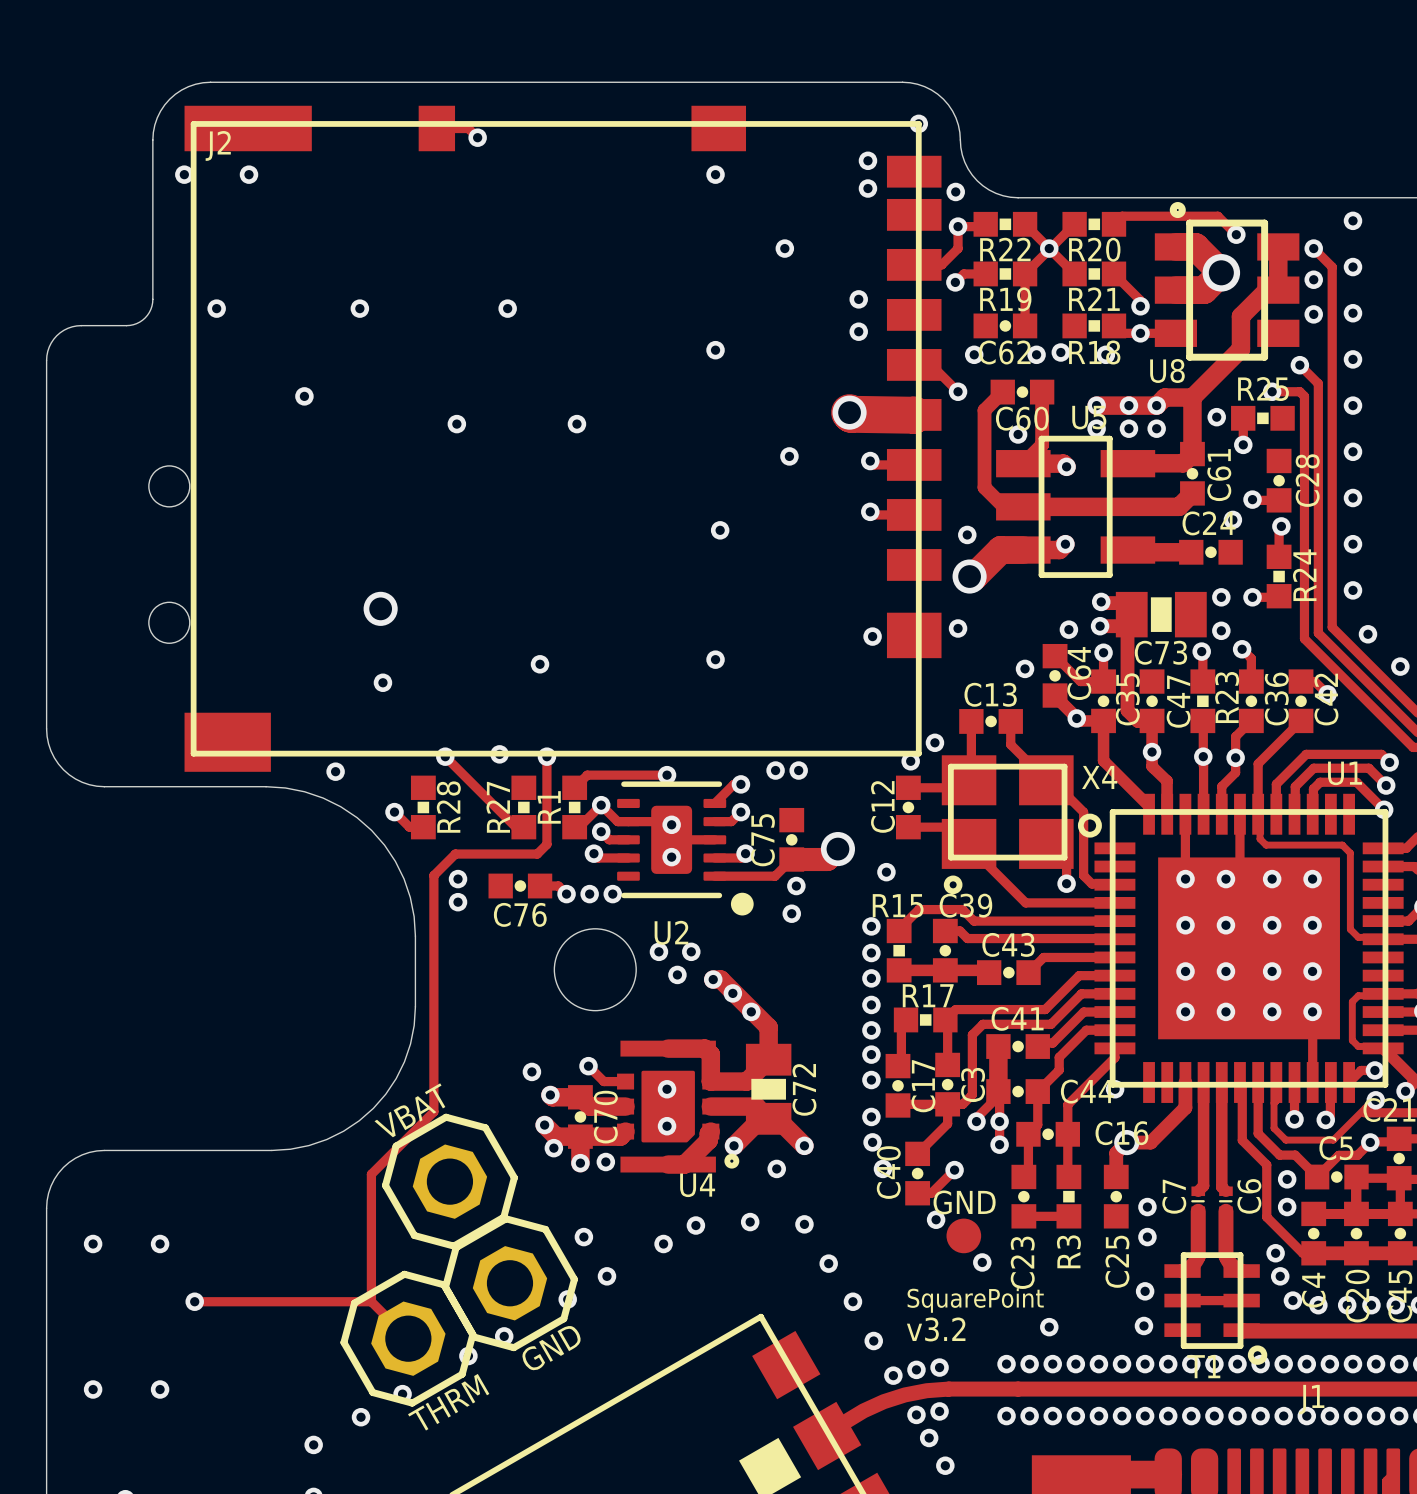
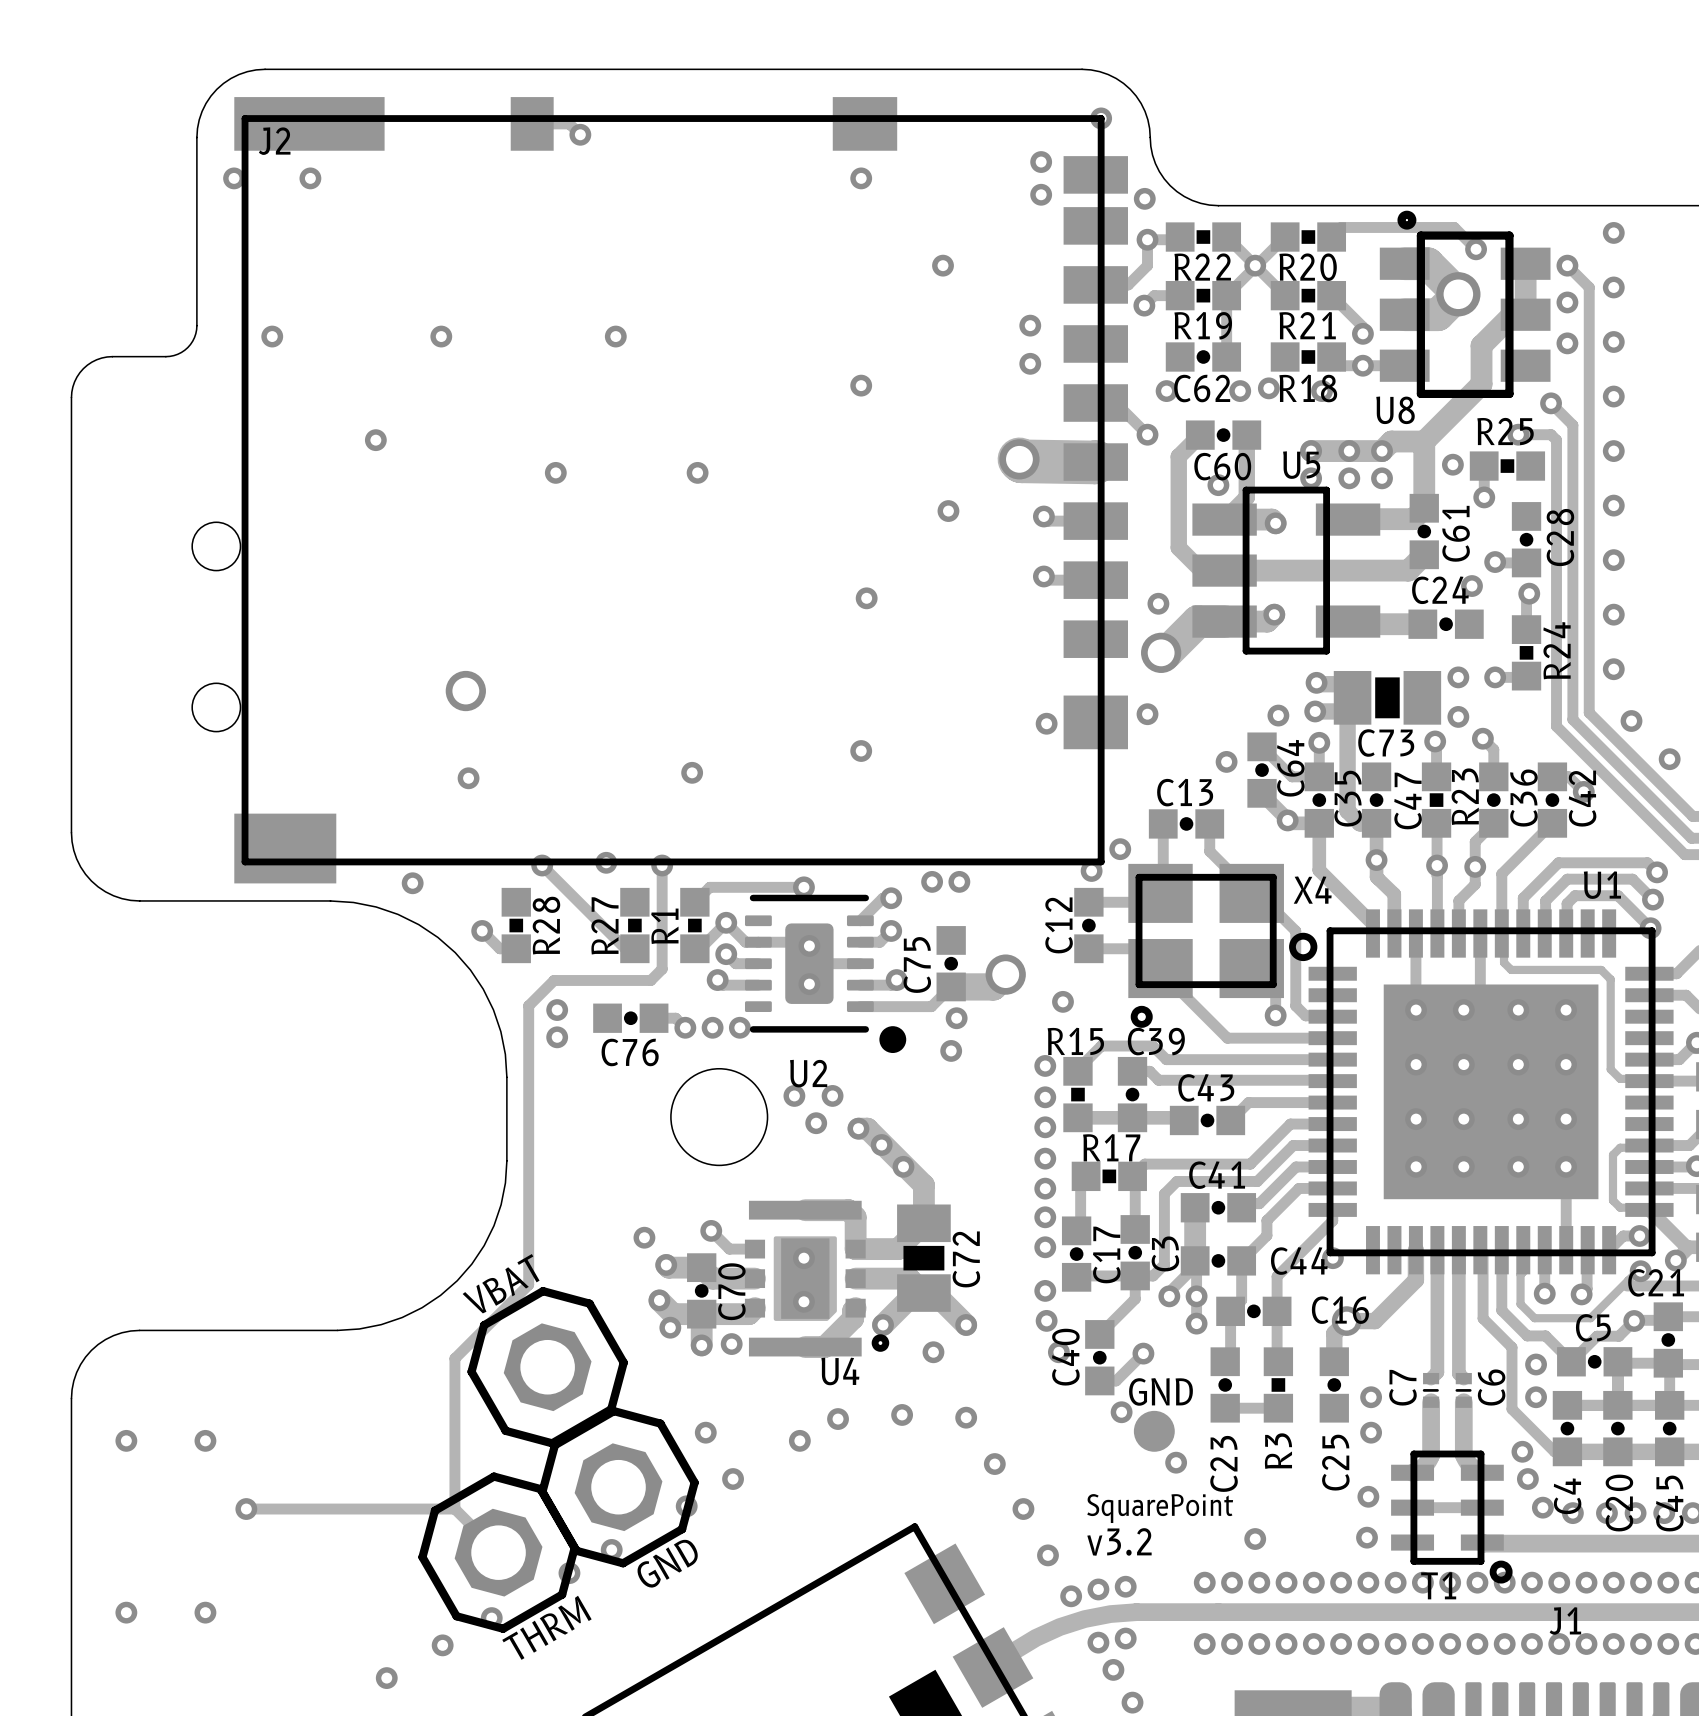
via position: (540, 664) -> (692, 772)

